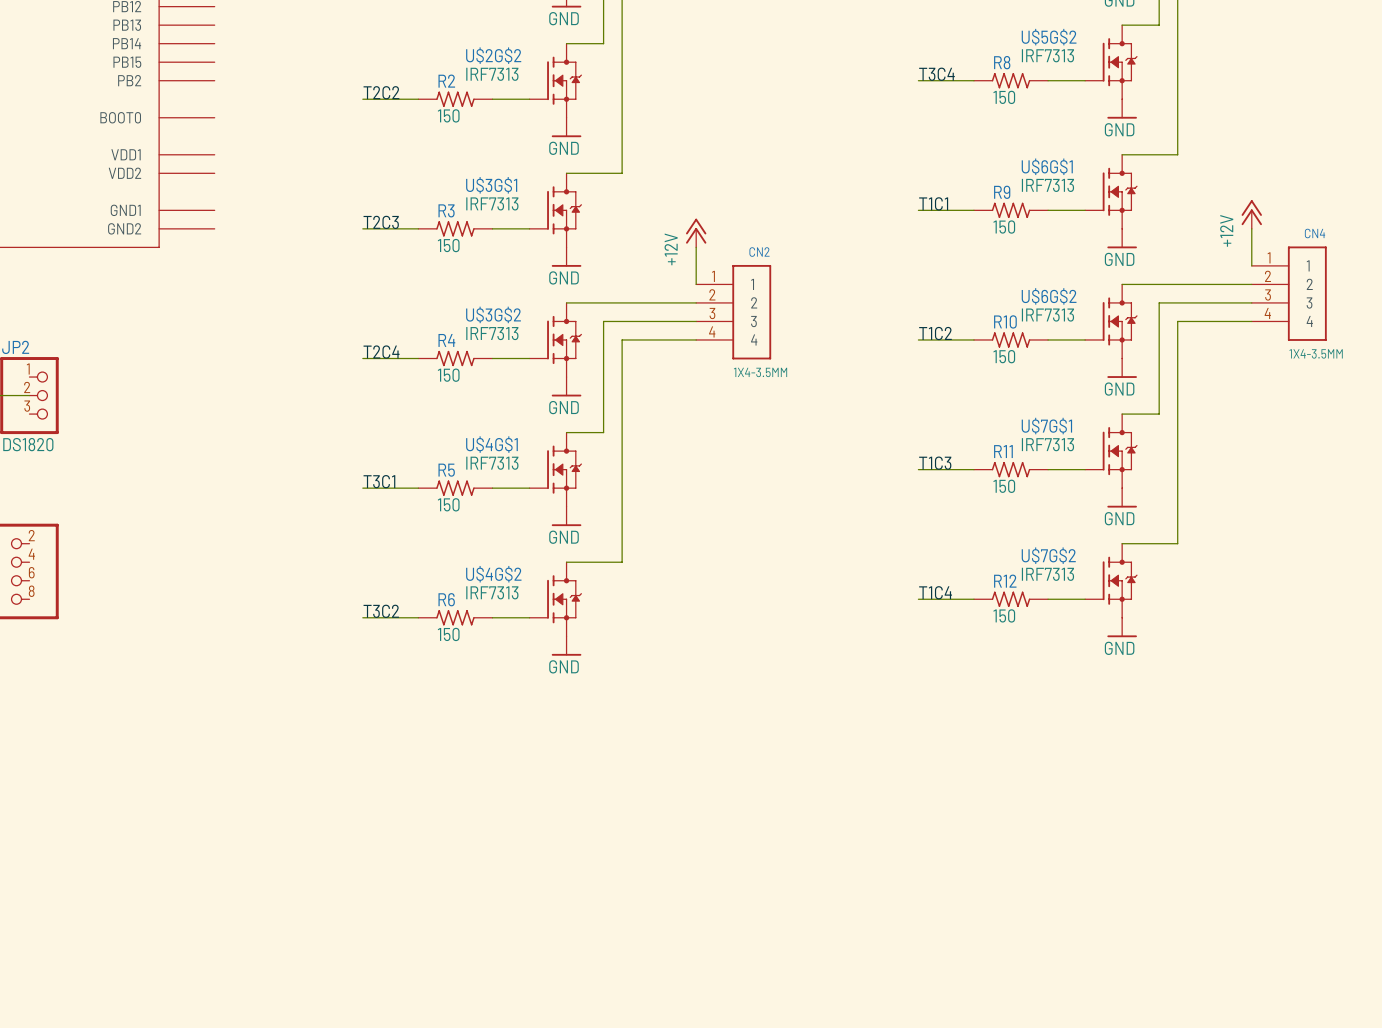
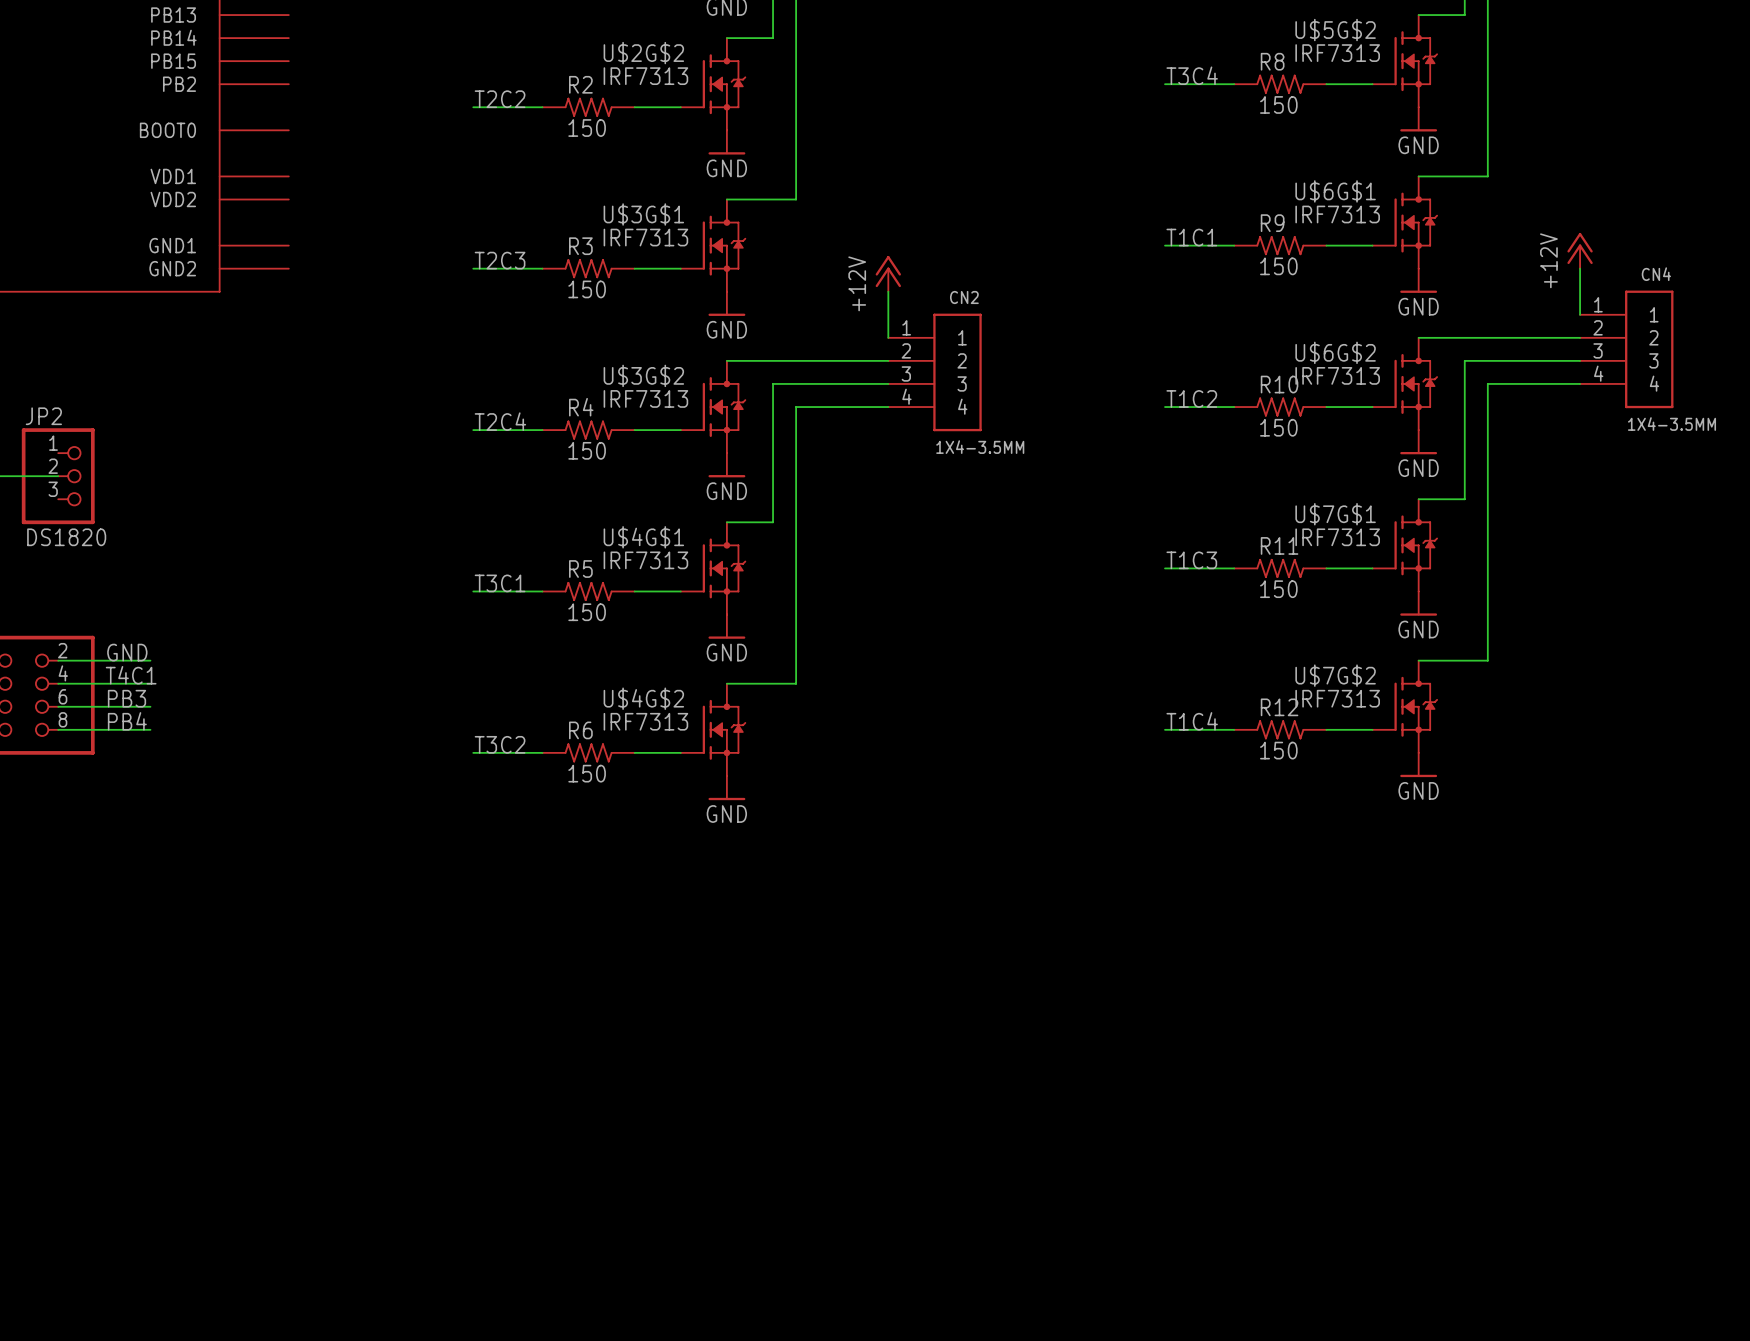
label: none -> GND (127, 652)
wire: none -> (58, 660) (150, 660)
label: none -> T4C1 (131, 675)
wire: none -> (58, 683) (150, 683)
label: none -> PB3 (126, 698)
wire: none -> (58, 706) (150, 706)
label: none -> PB4 (127, 721)
wire: none -> (58, 729) (150, 729)

